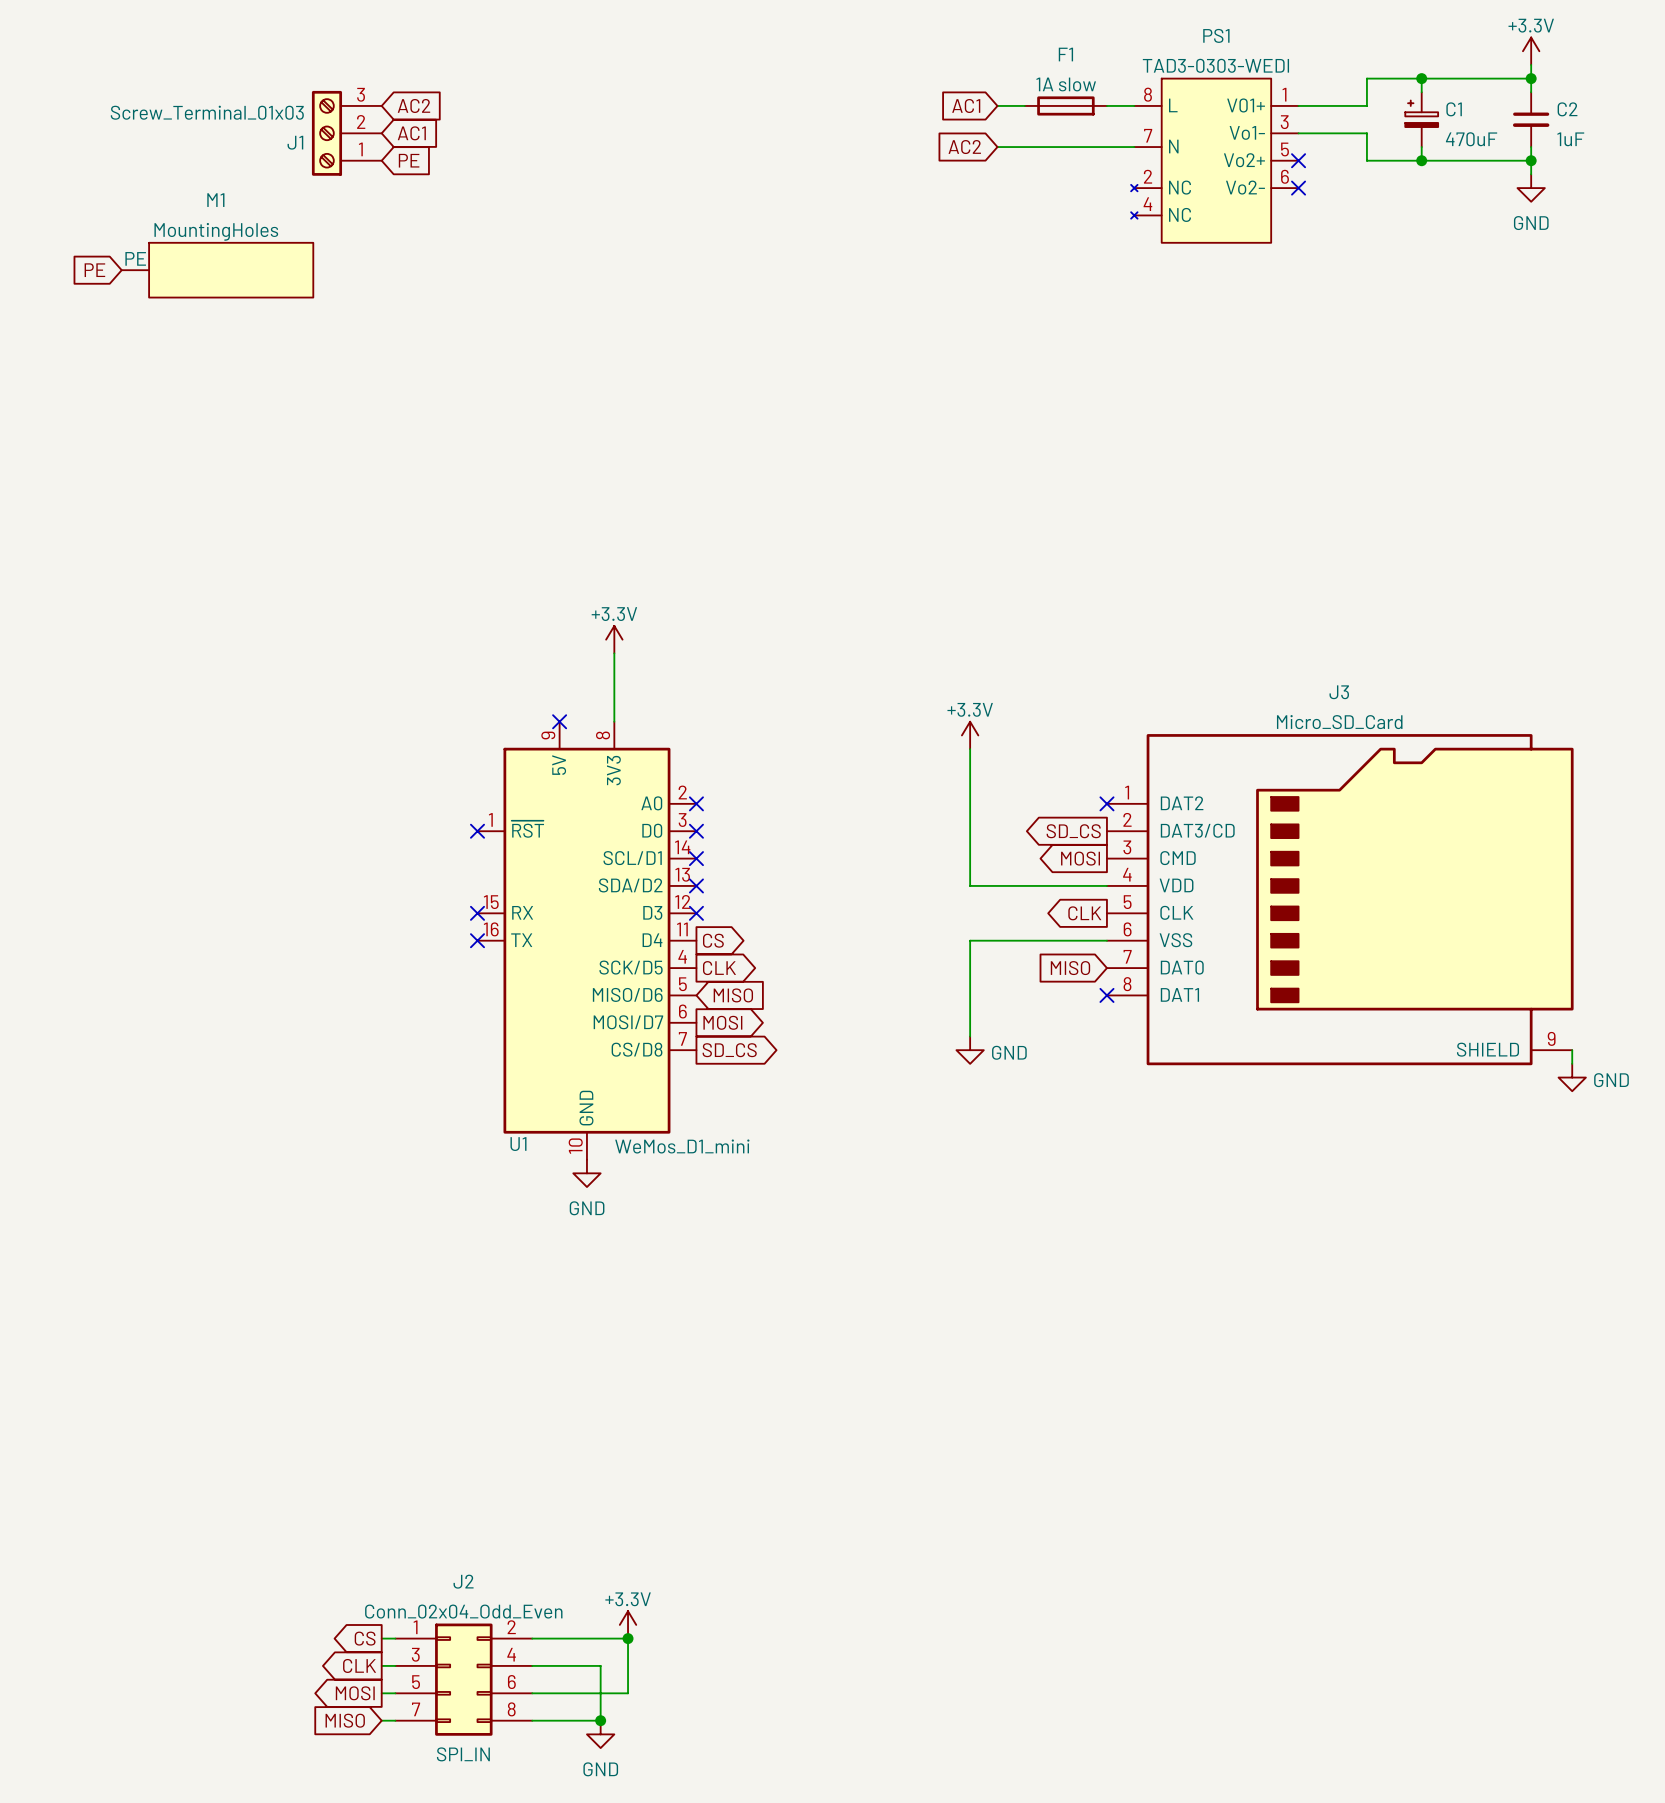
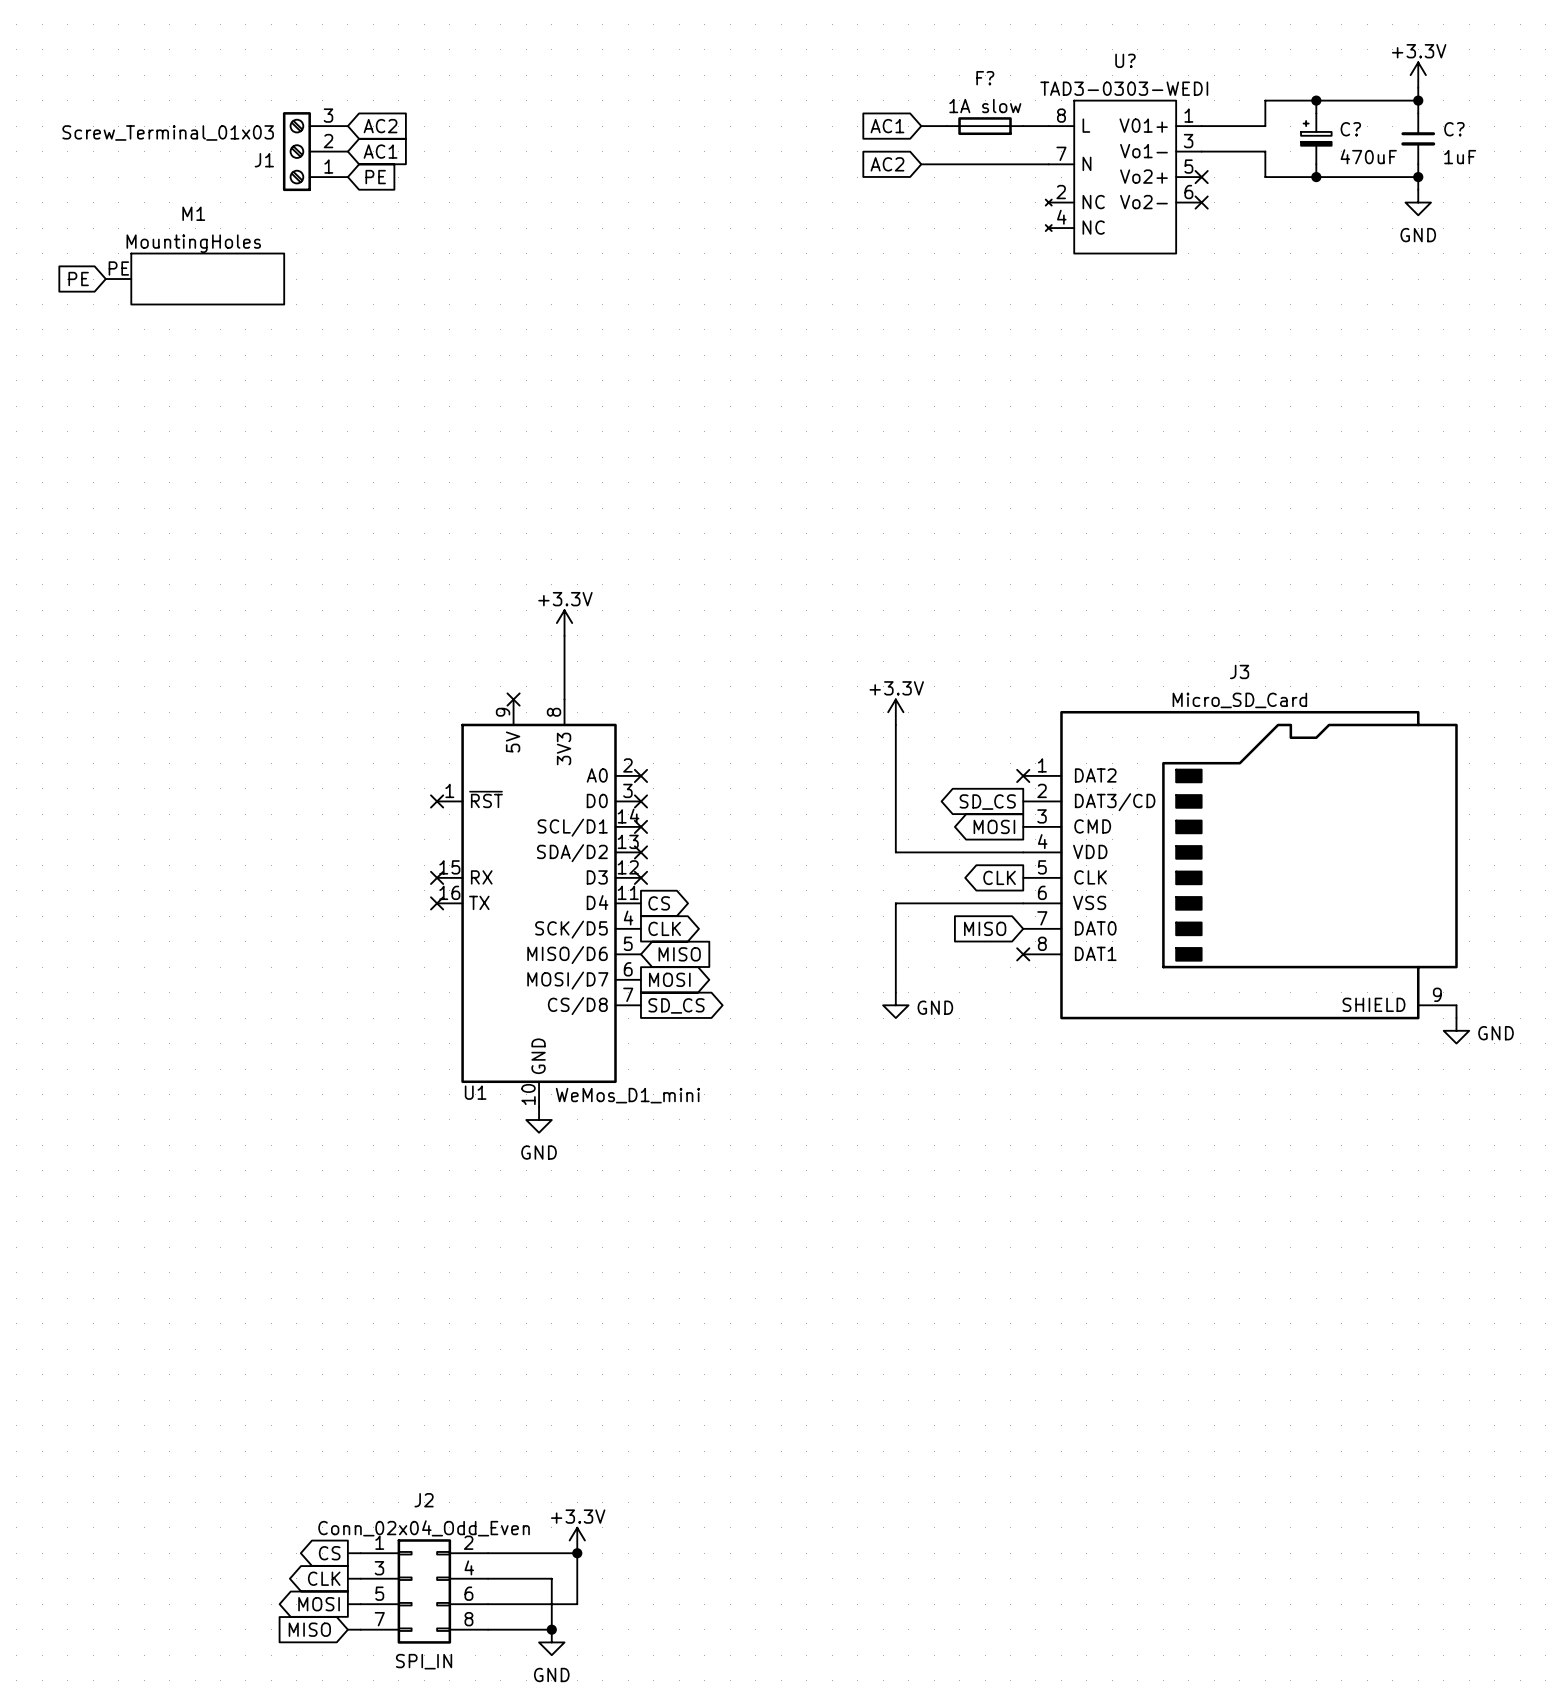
PS1 name: PS1 (1216, 35) -> U? (1125, 60)
F1 name: F1 (1065, 54) -> F? (985, 78)
C1 name: C1 (1454, 109) -> C? (1350, 129)
C2 name: C2 (1567, 109) -> C? (1454, 129)

